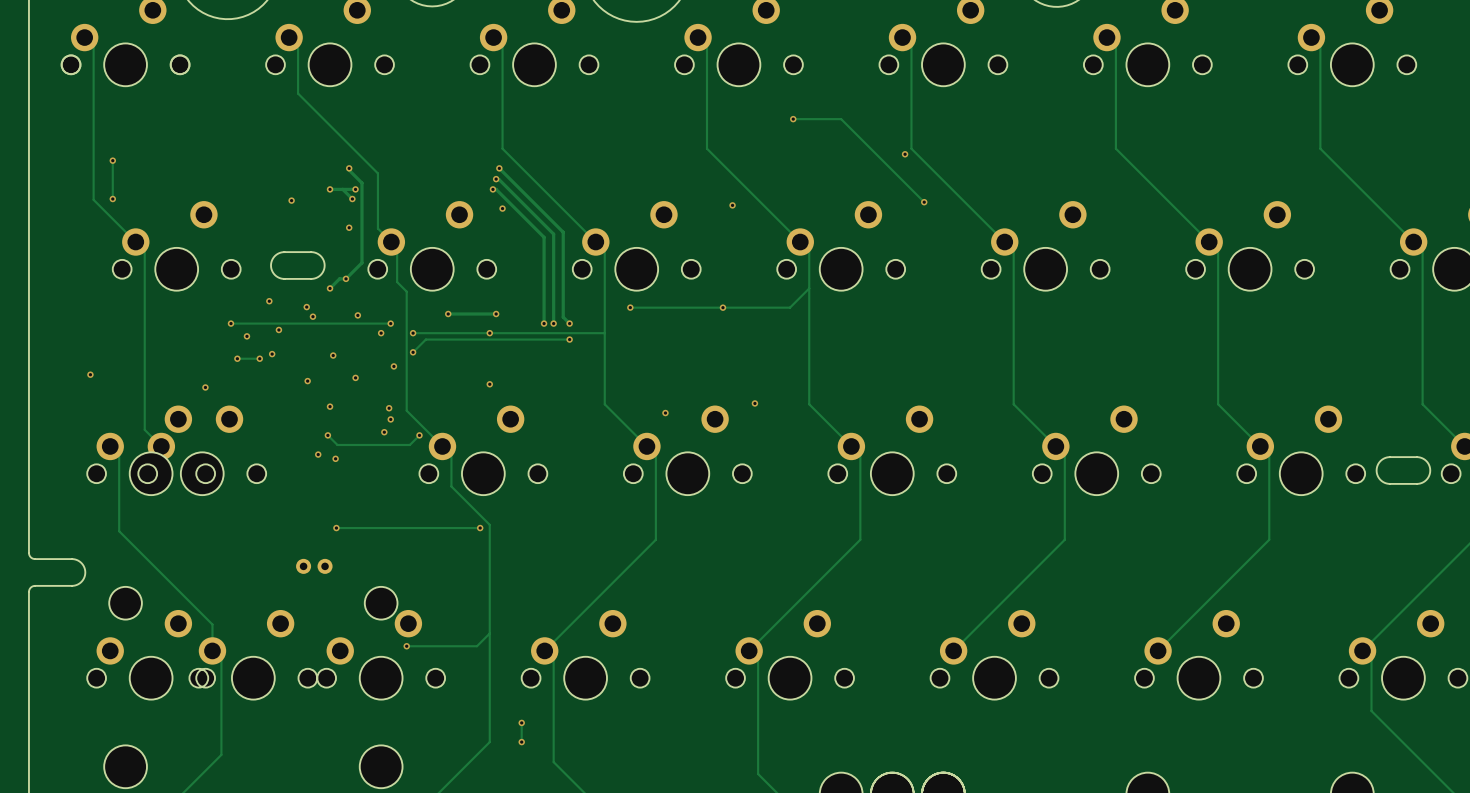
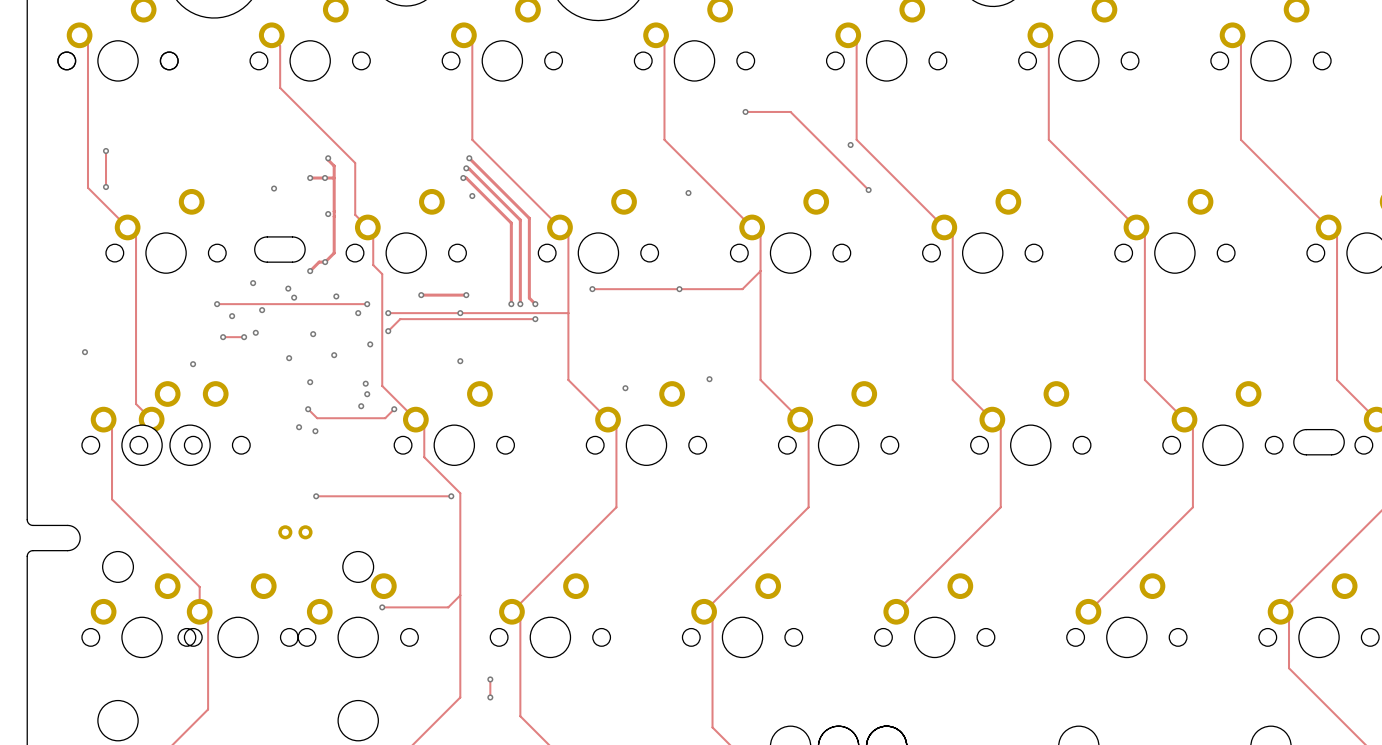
track: (355, 176) (361, 183) (361, 262) (355, 269) -> (334, 166) (334, 211)
track: (342, 189) (352, 198) -> none
via: none -> (325, 178)
via: (355, 189) -> none
via: (352, 198) -> none
track: none -> (334, 211) (334, 216)
track: none -> (334, 216) (334, 253)

